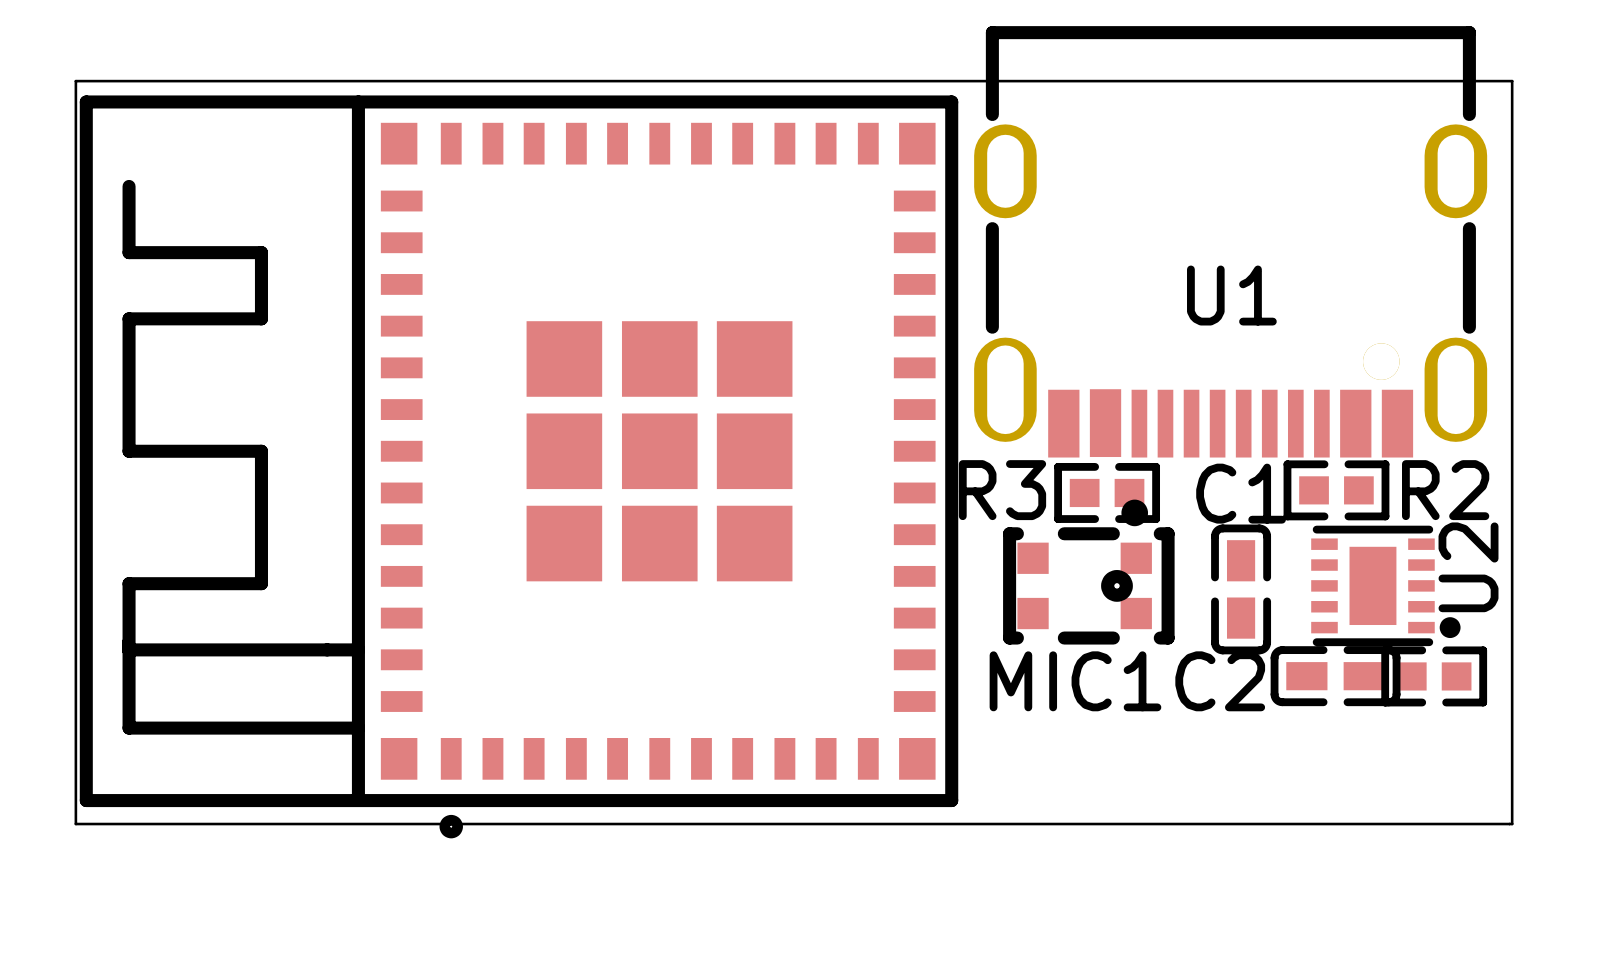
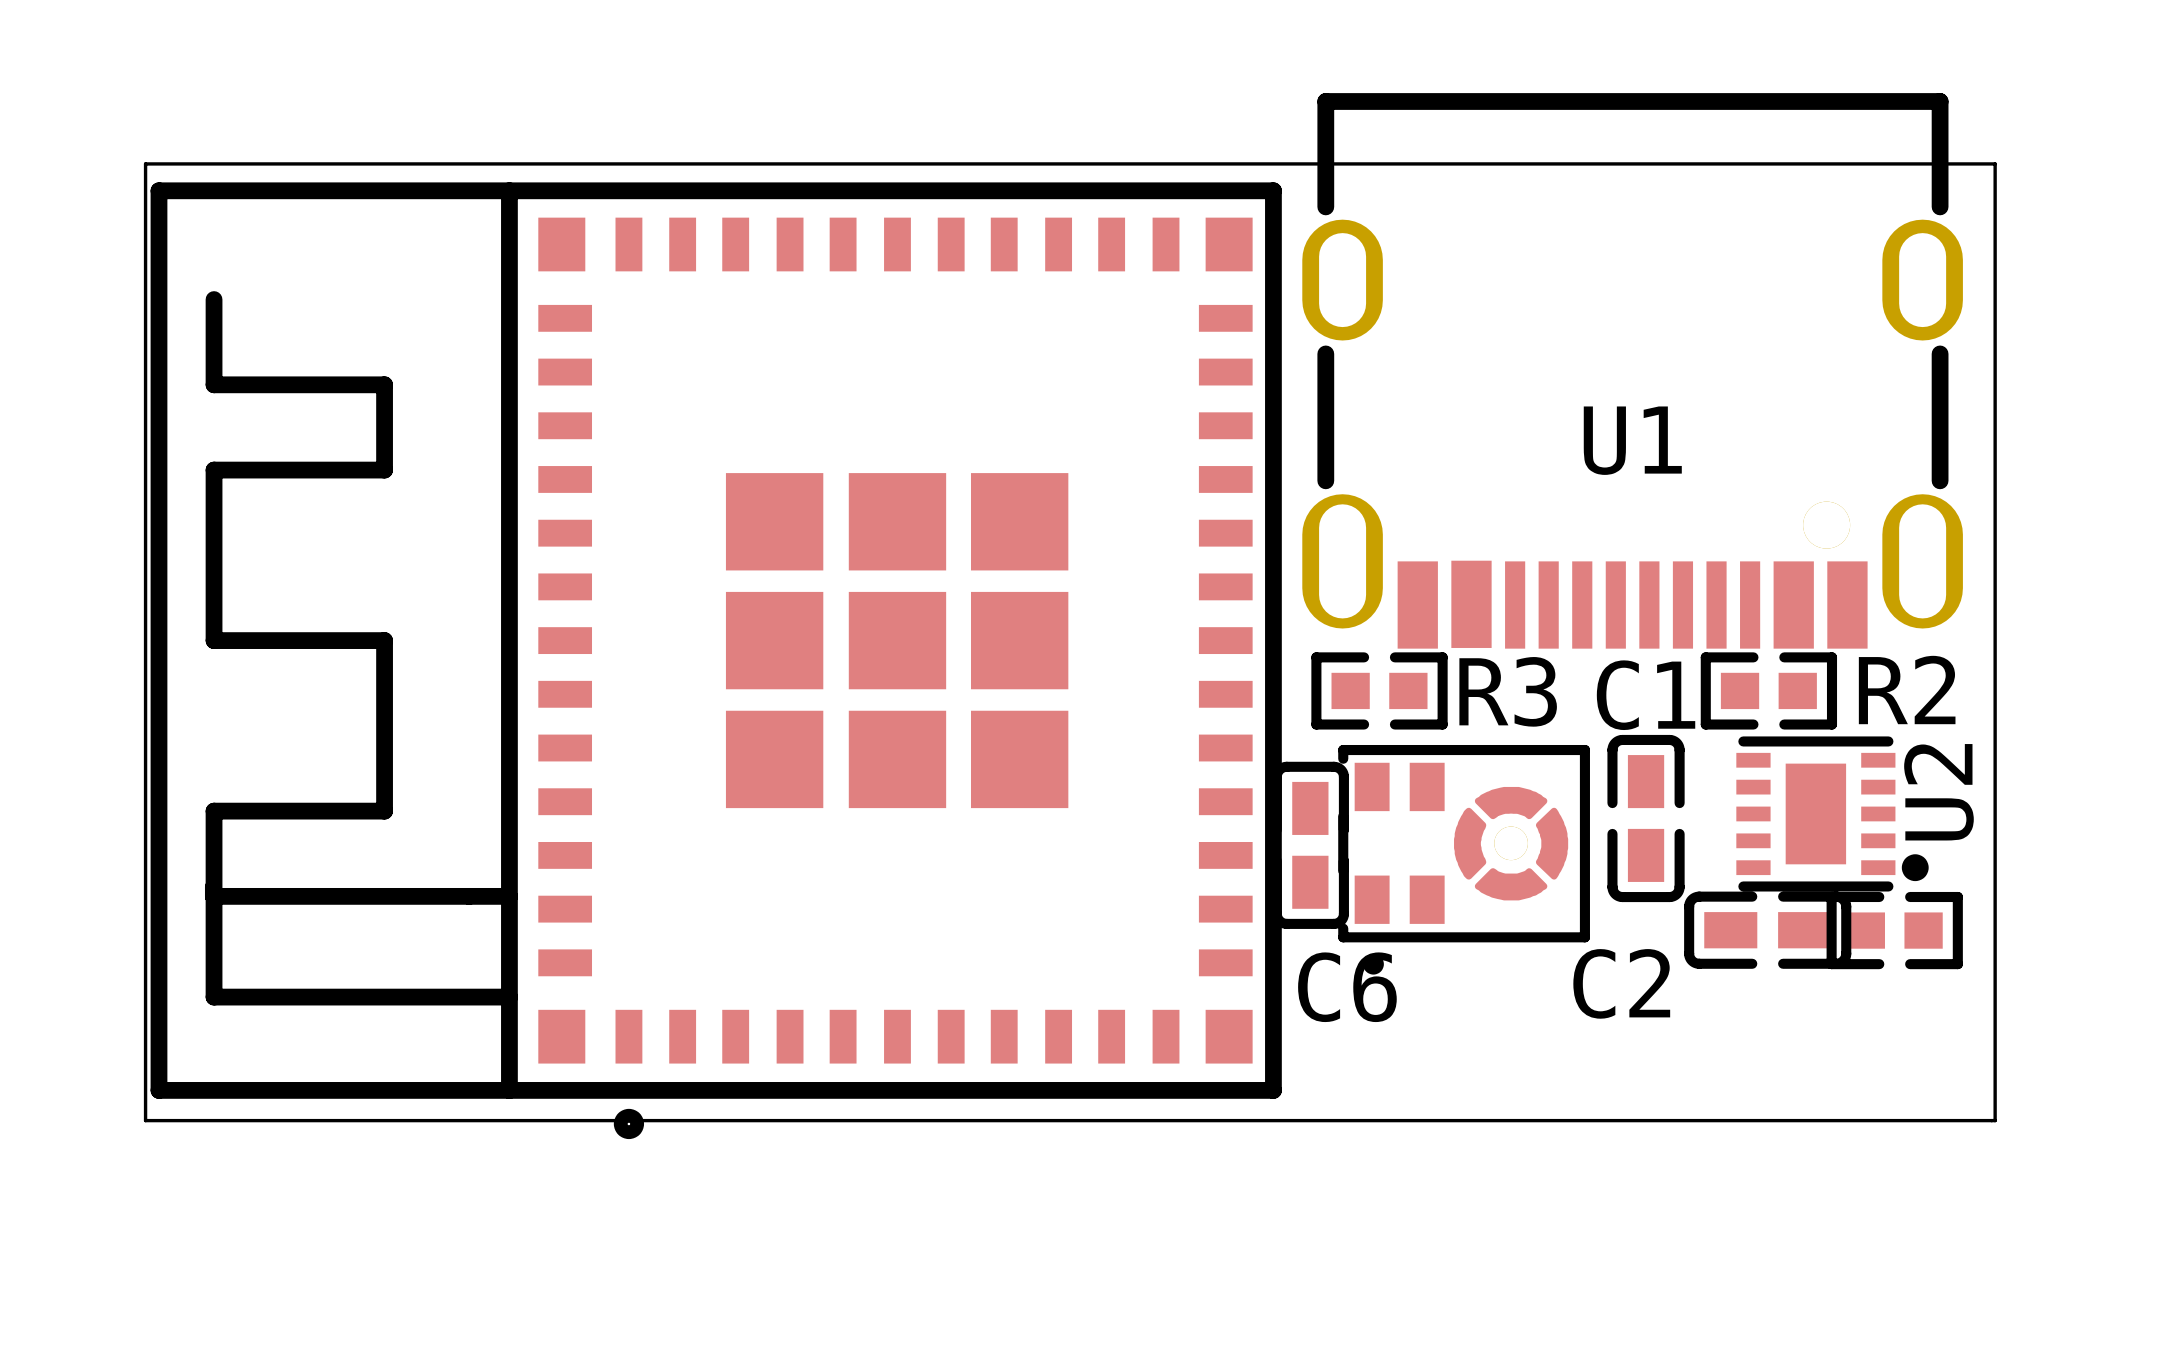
R3 name position: R3 (1002, 490) -> R3 (1508, 691)
R3 position: (1107, 492) -> (1379, 690)
MIC1: (1088, 572) -> none
C6: none -> (1310, 845)
part: none -> (1464, 859)
C2 name position: C2 (1220, 681) -> C2 (1621, 983)

